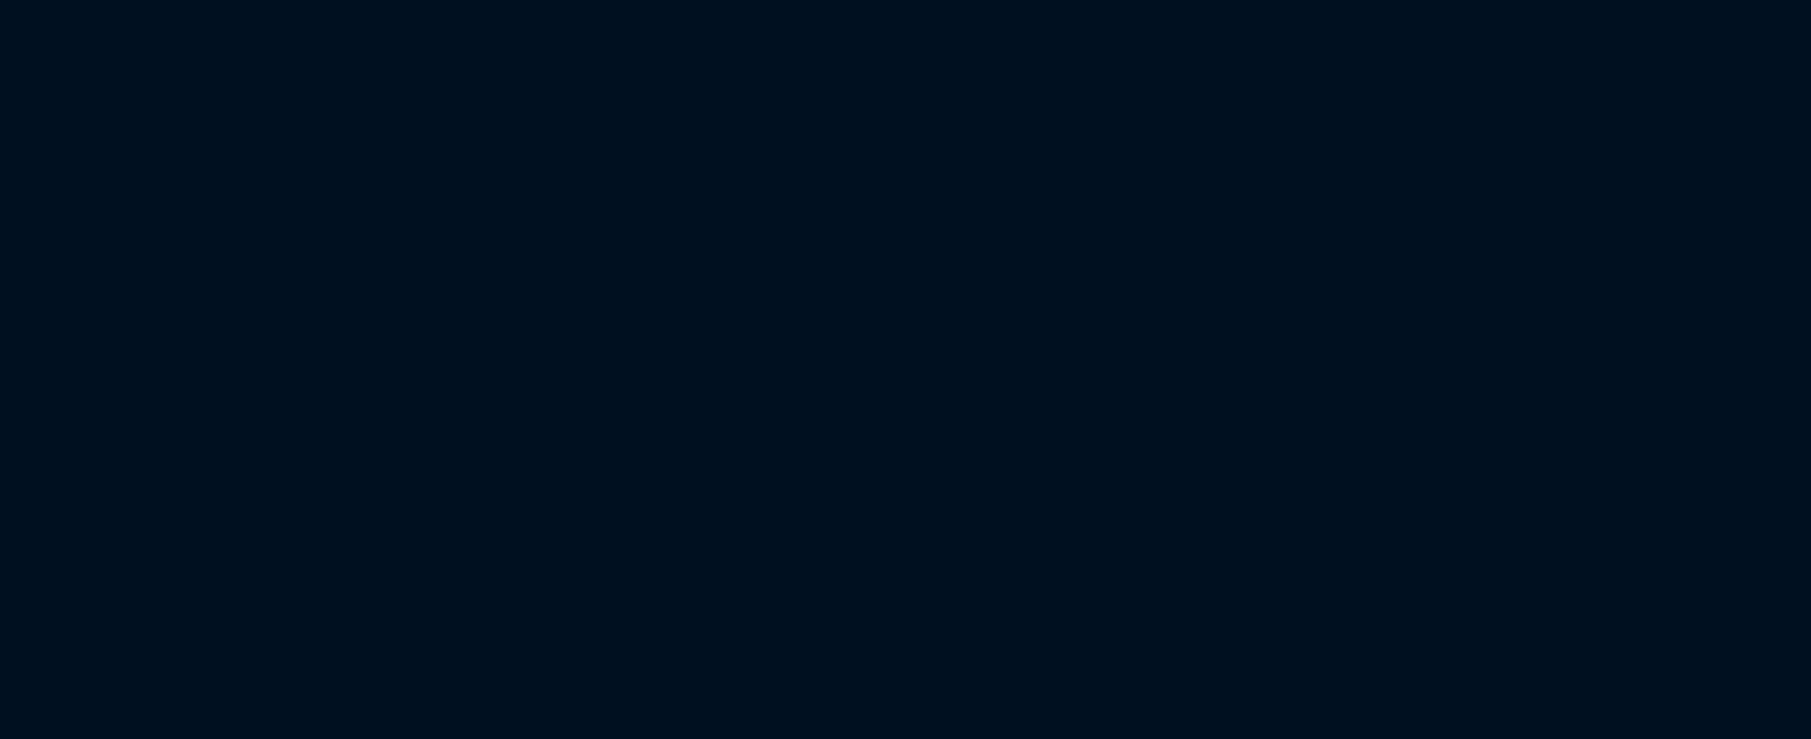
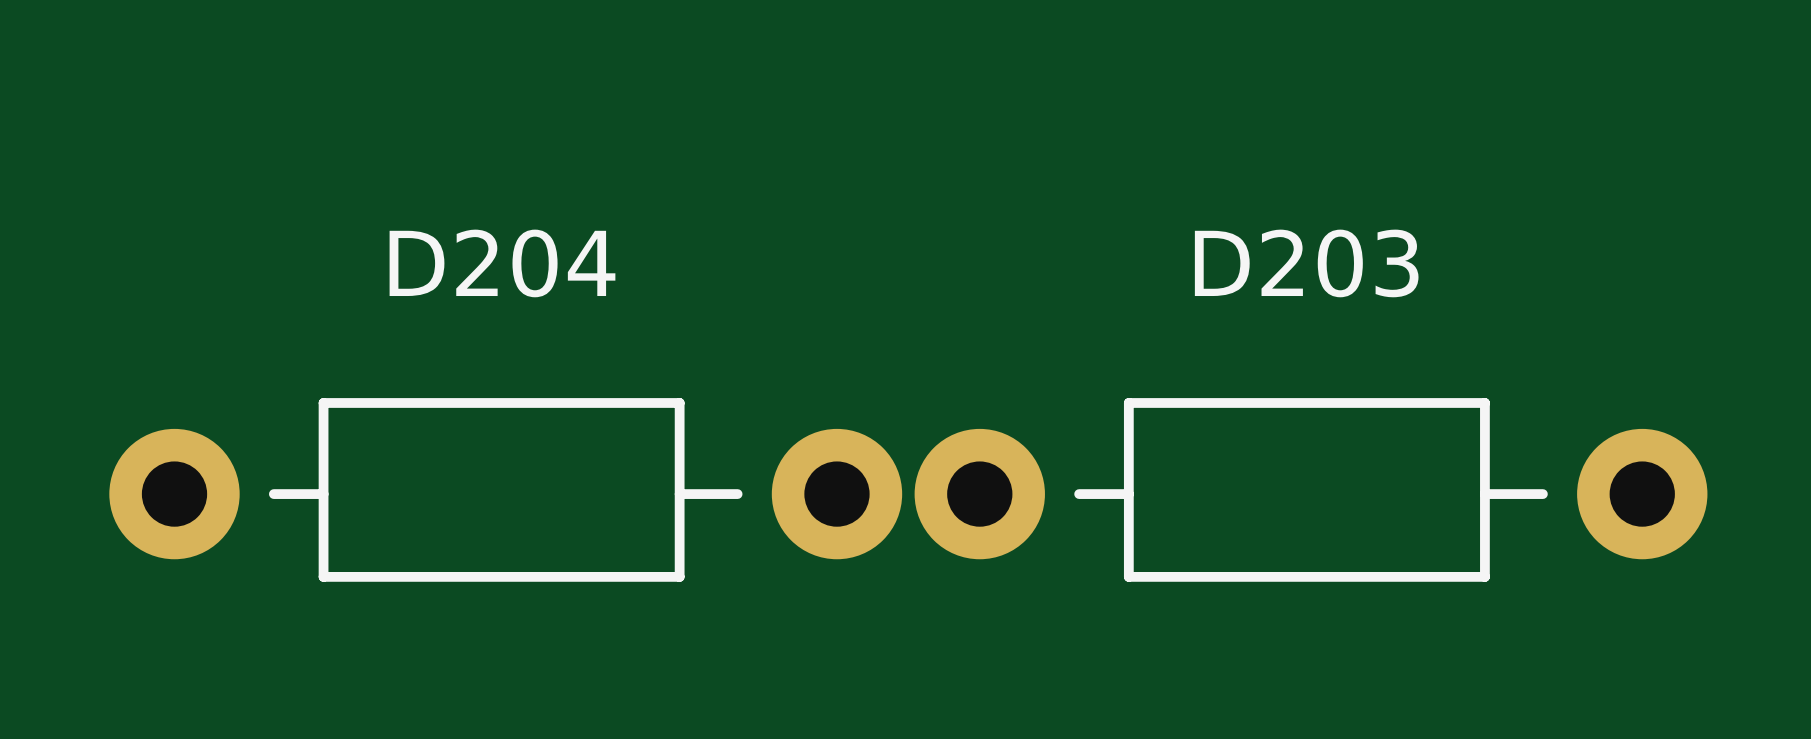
D204: none -> (505, 489)
D203: none -> (1311, 489)

